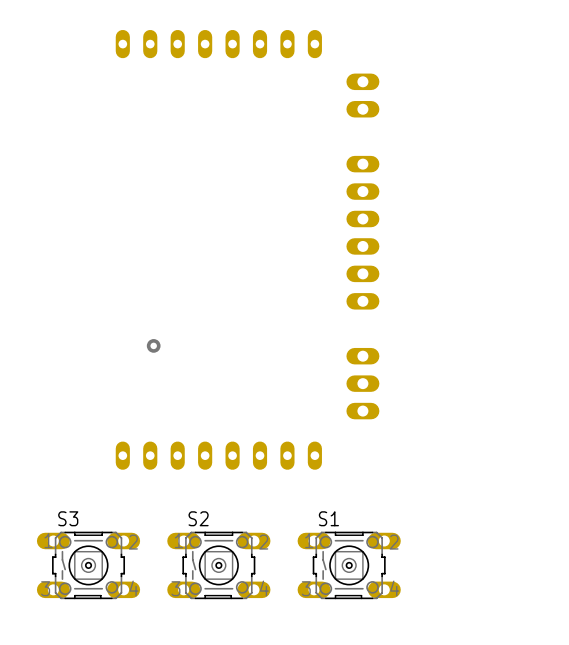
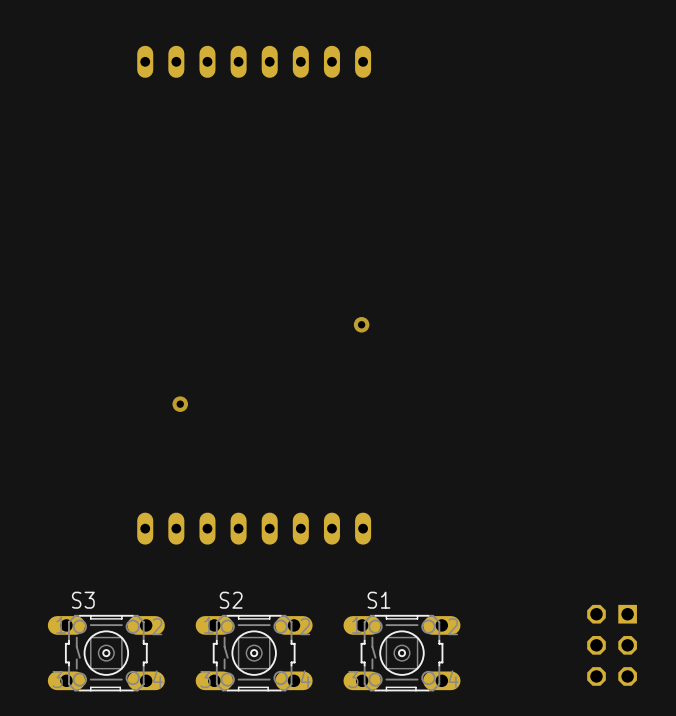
part: (362, 95) -> none
part: (362, 232) -> none
via: none -> (361, 324)
part: (362, 383) -> none
part: none -> (612, 645)

